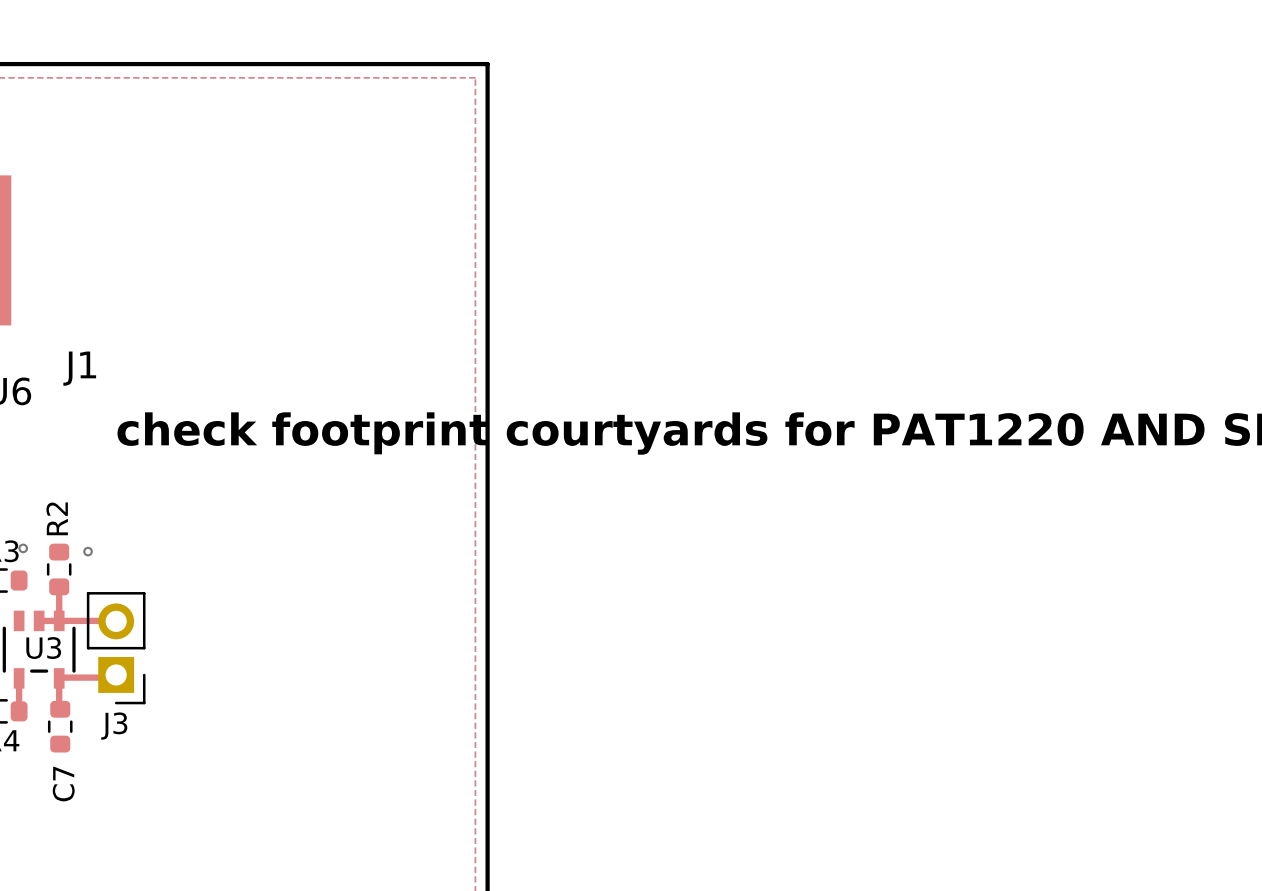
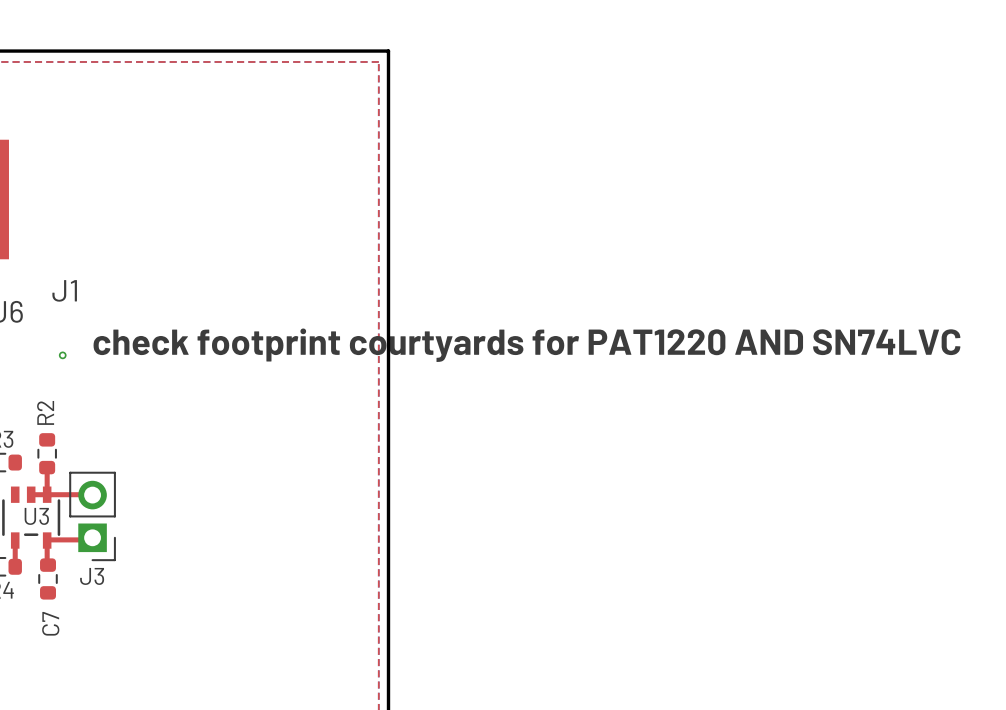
via: none -> (62, 355)
via: (23, 548) -> none
via: (88, 551) -> none

